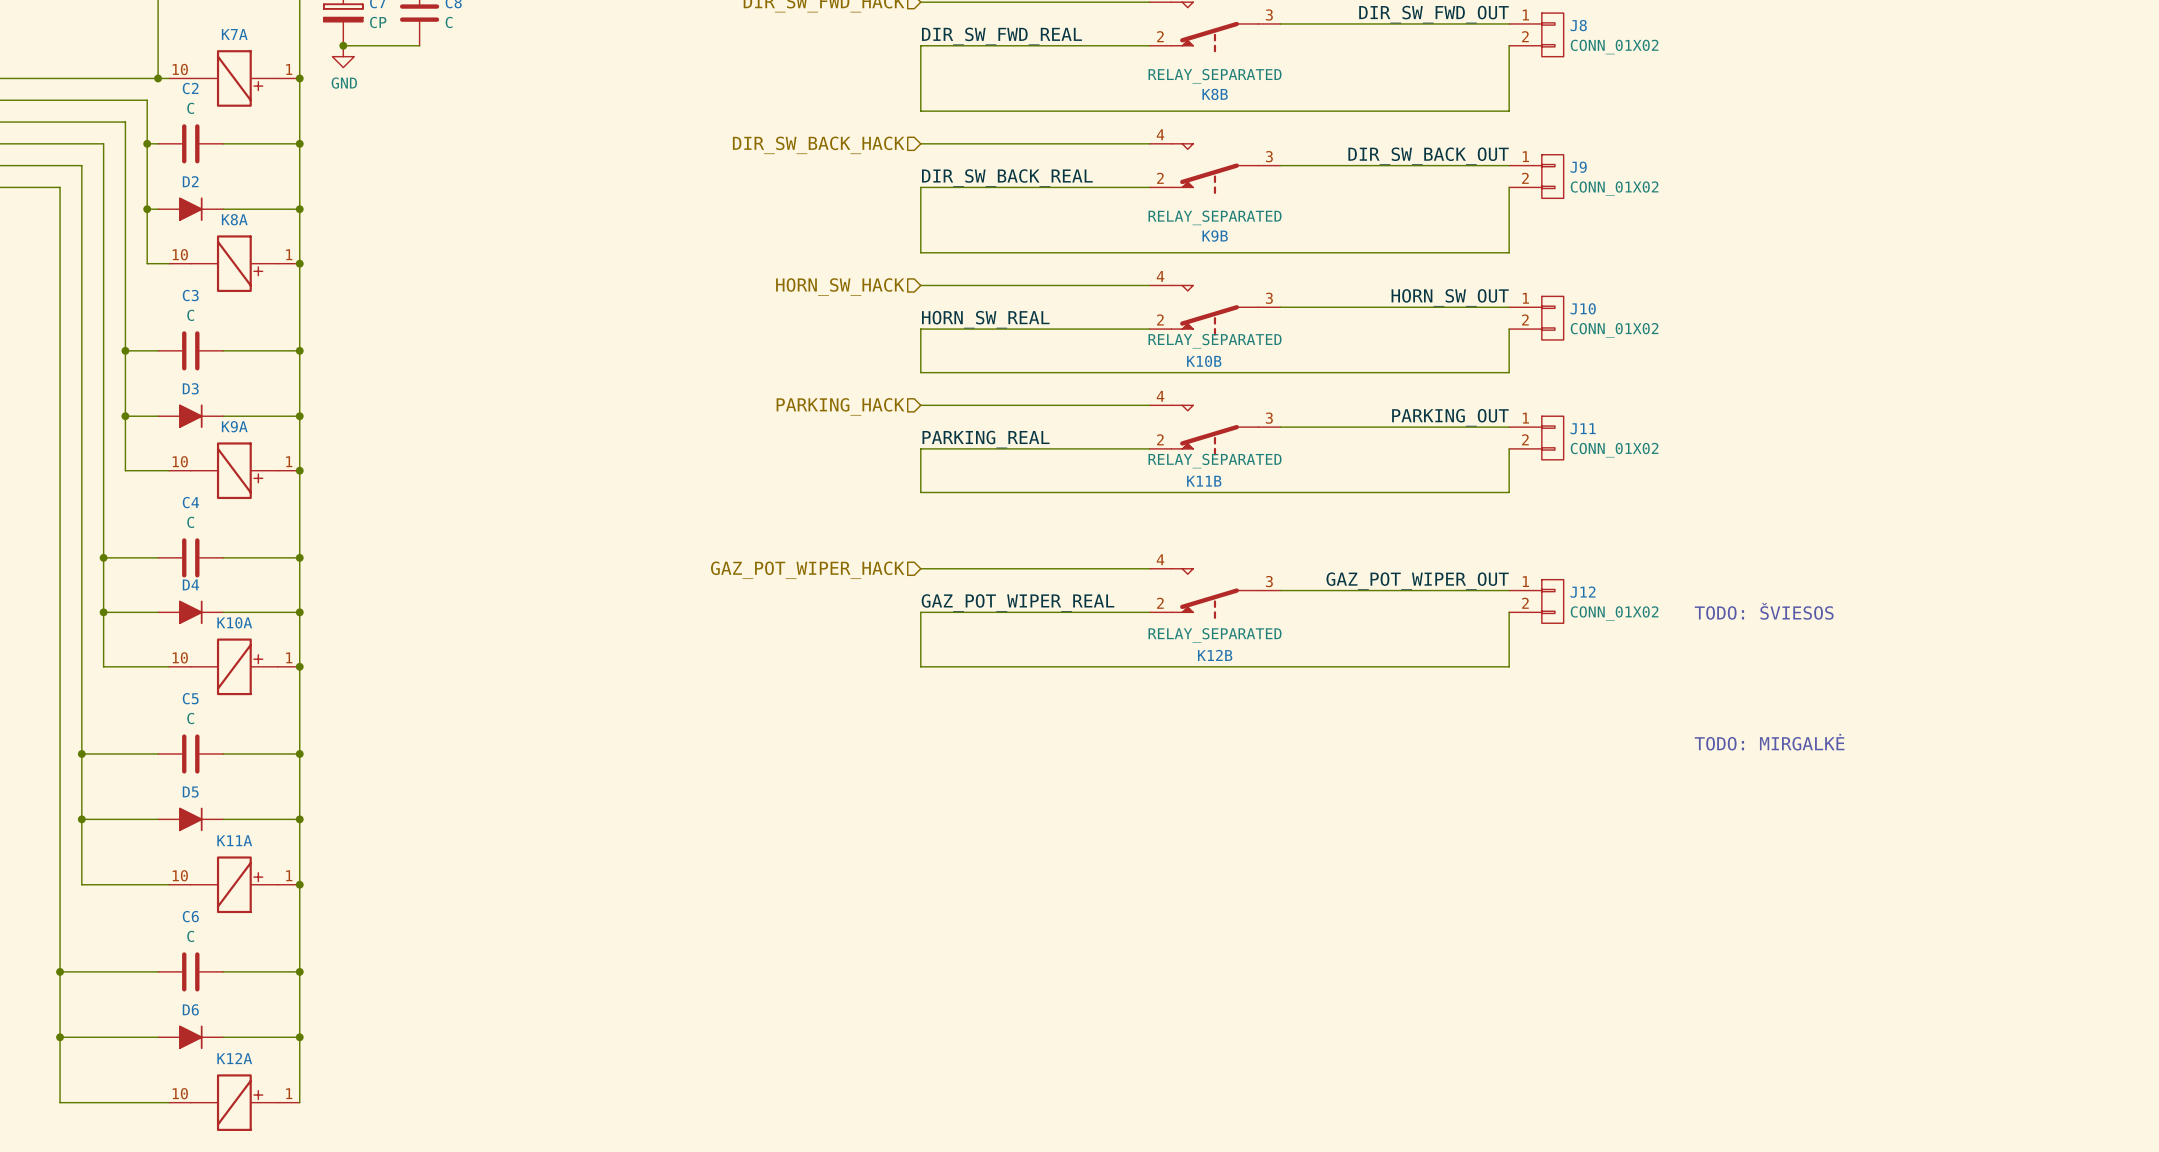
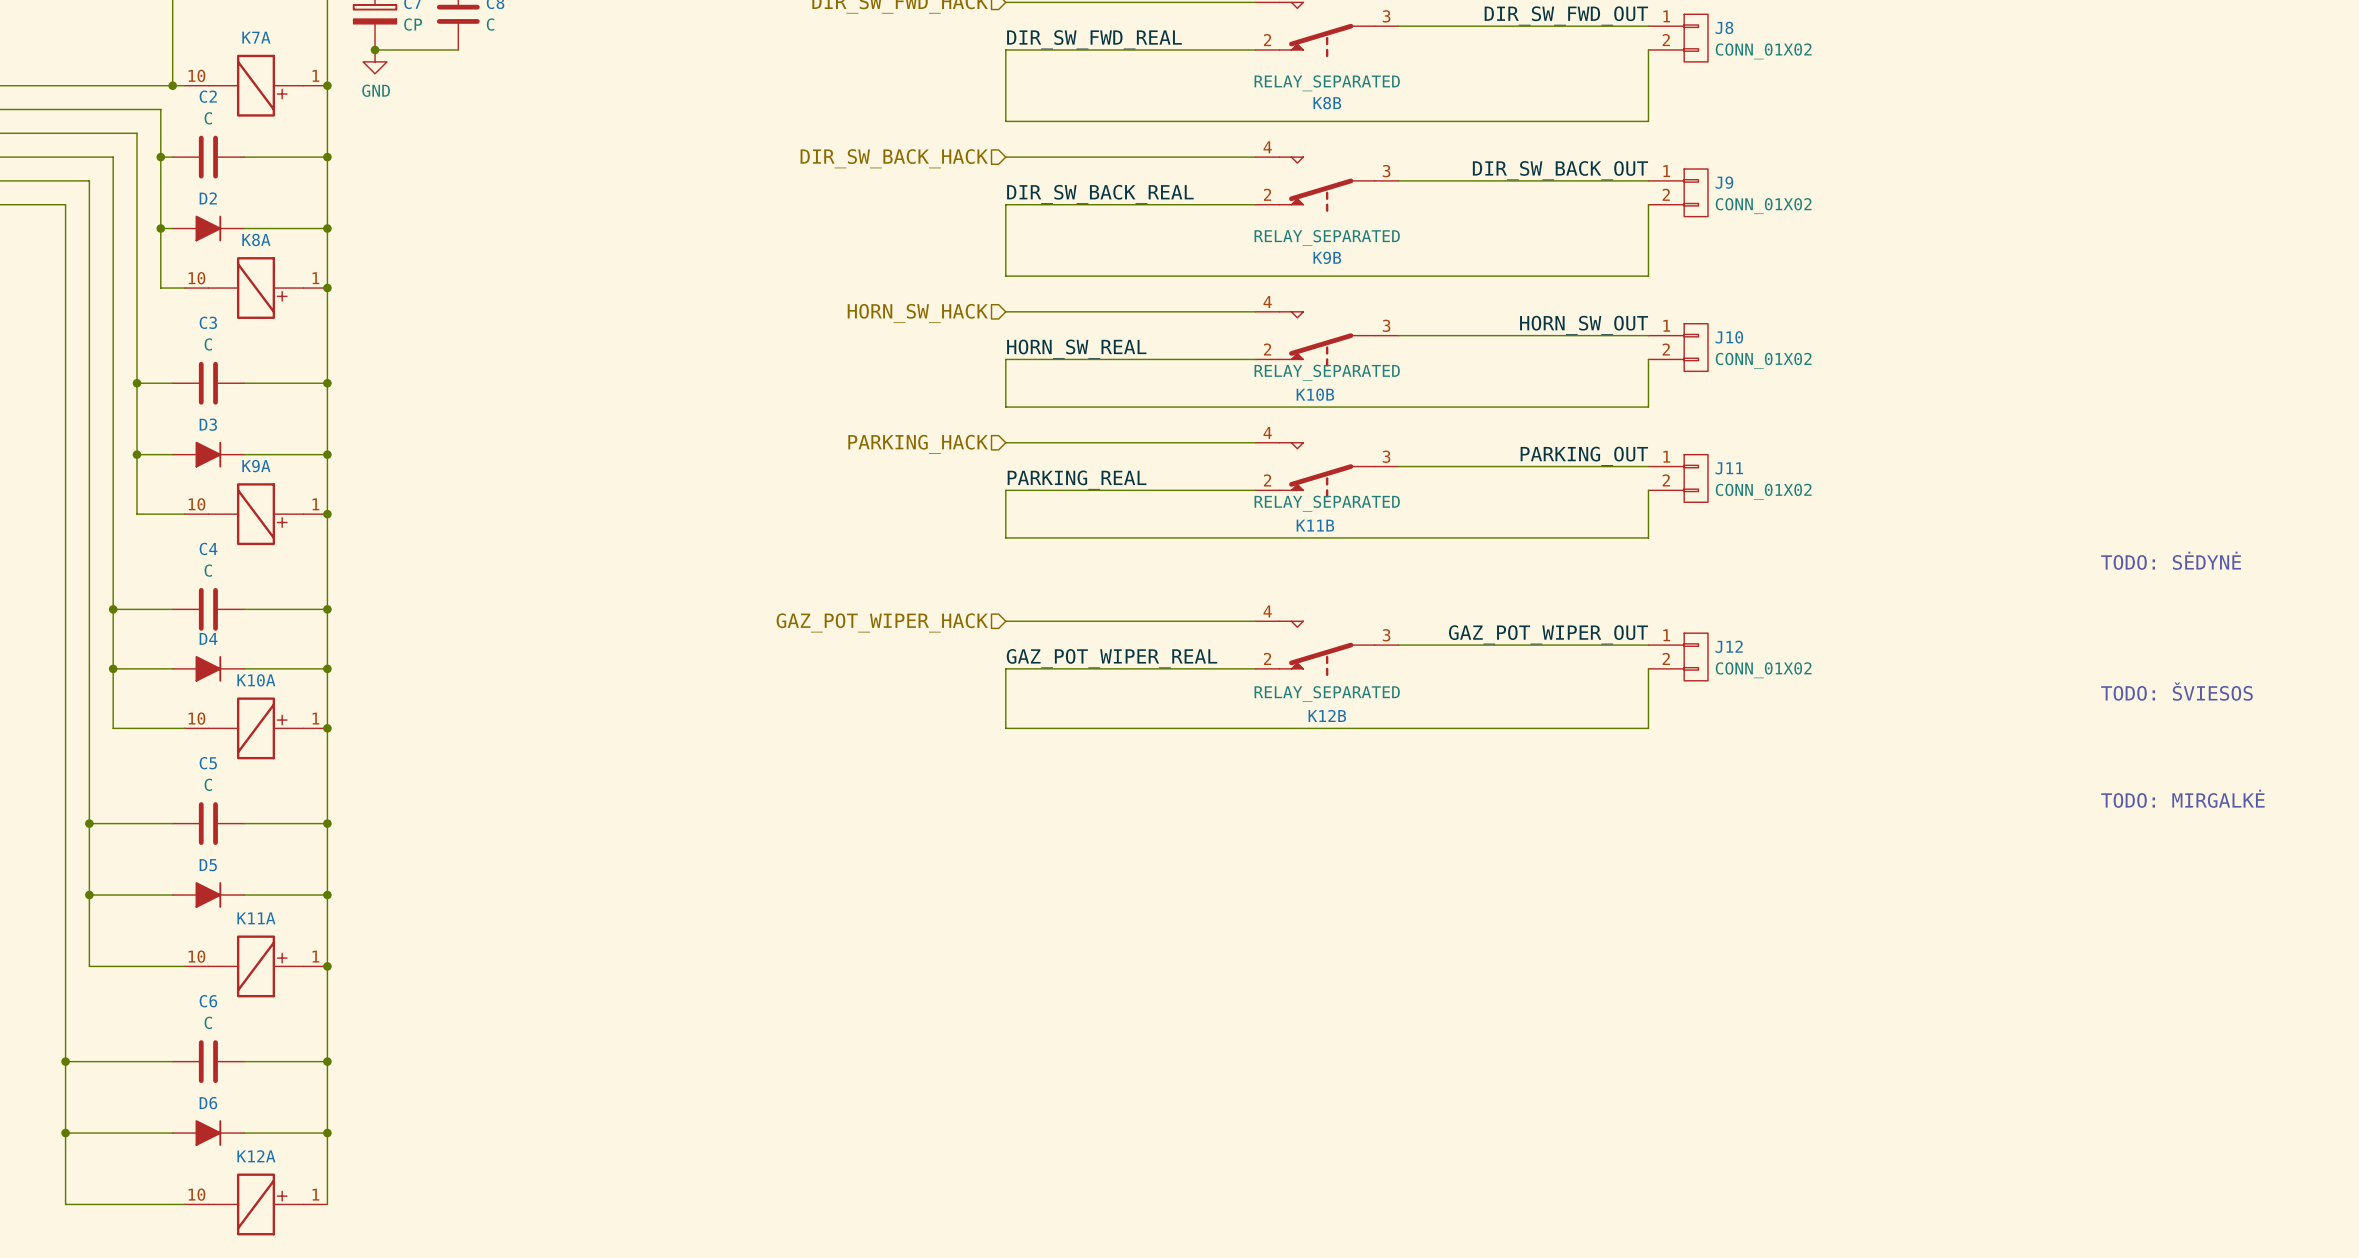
text: none -> TODO: SĖDYNĖ (2171, 560)
text: TODO: ŠVIESOS (1764, 611) -> none
text: none -> TODO: ŠVIESOS (2176, 691)
text: none -> TODO: MIRGALKĖ (2182, 798)
text: TODO: MIRGALKĖ (1769, 742) -> none

